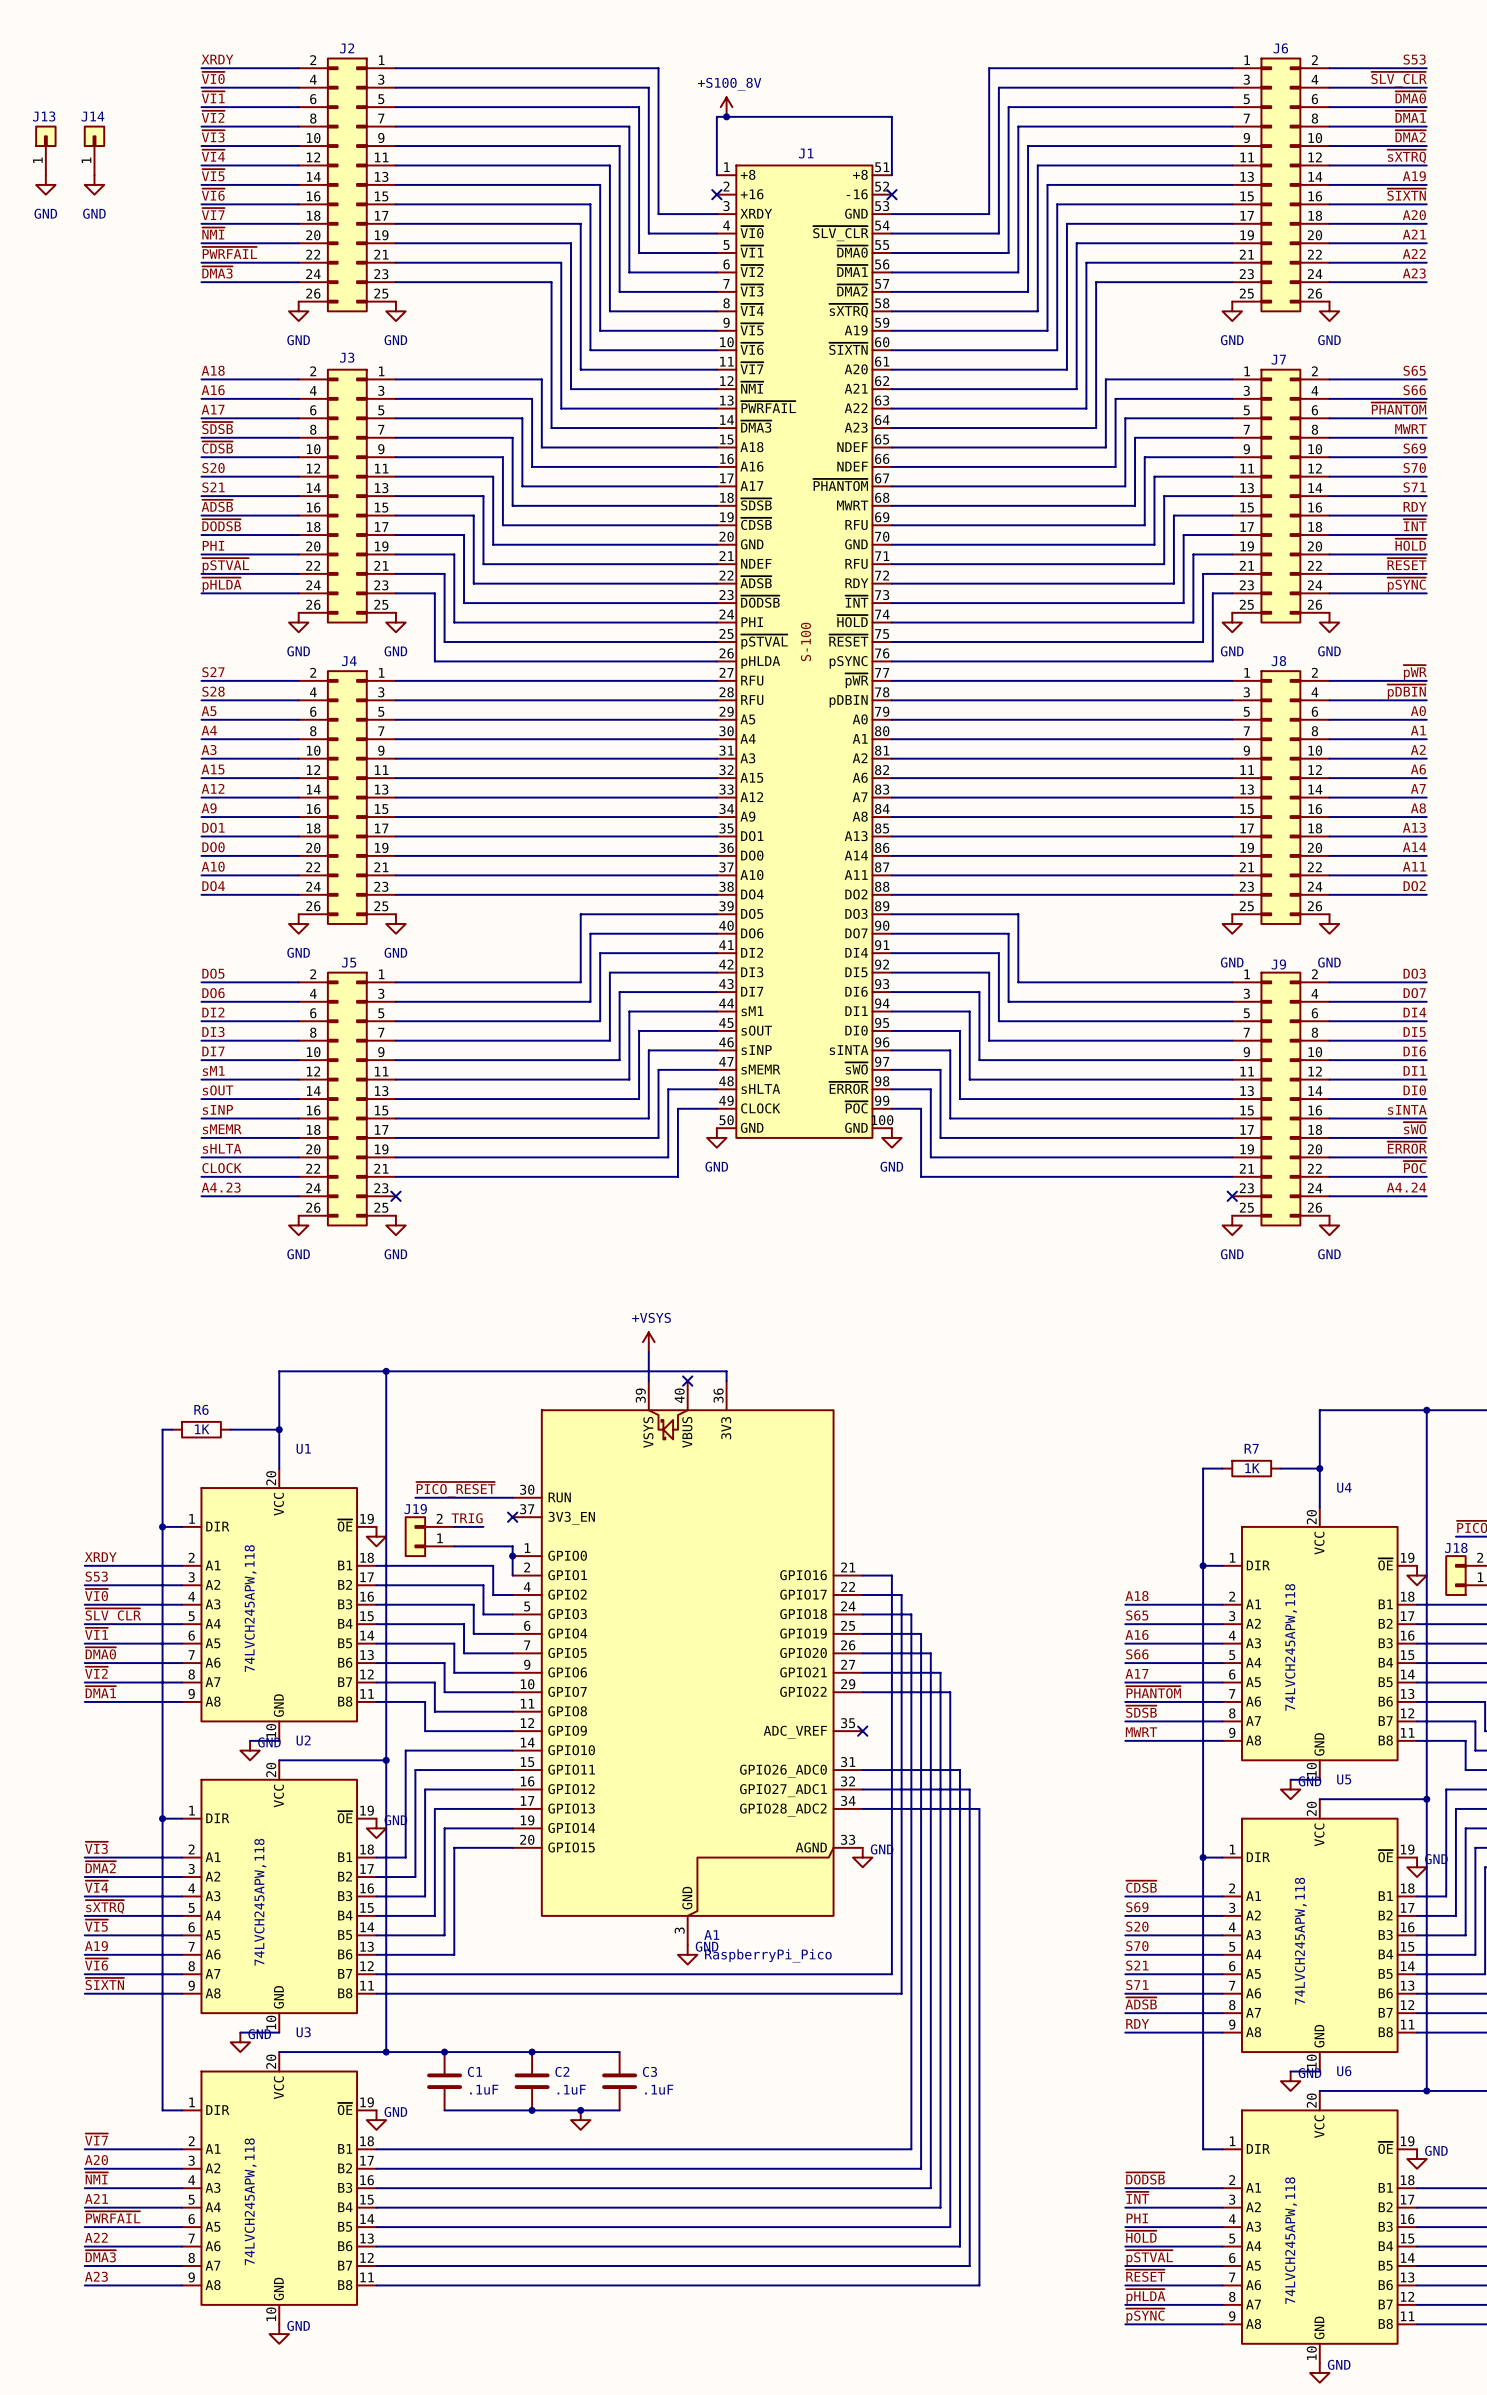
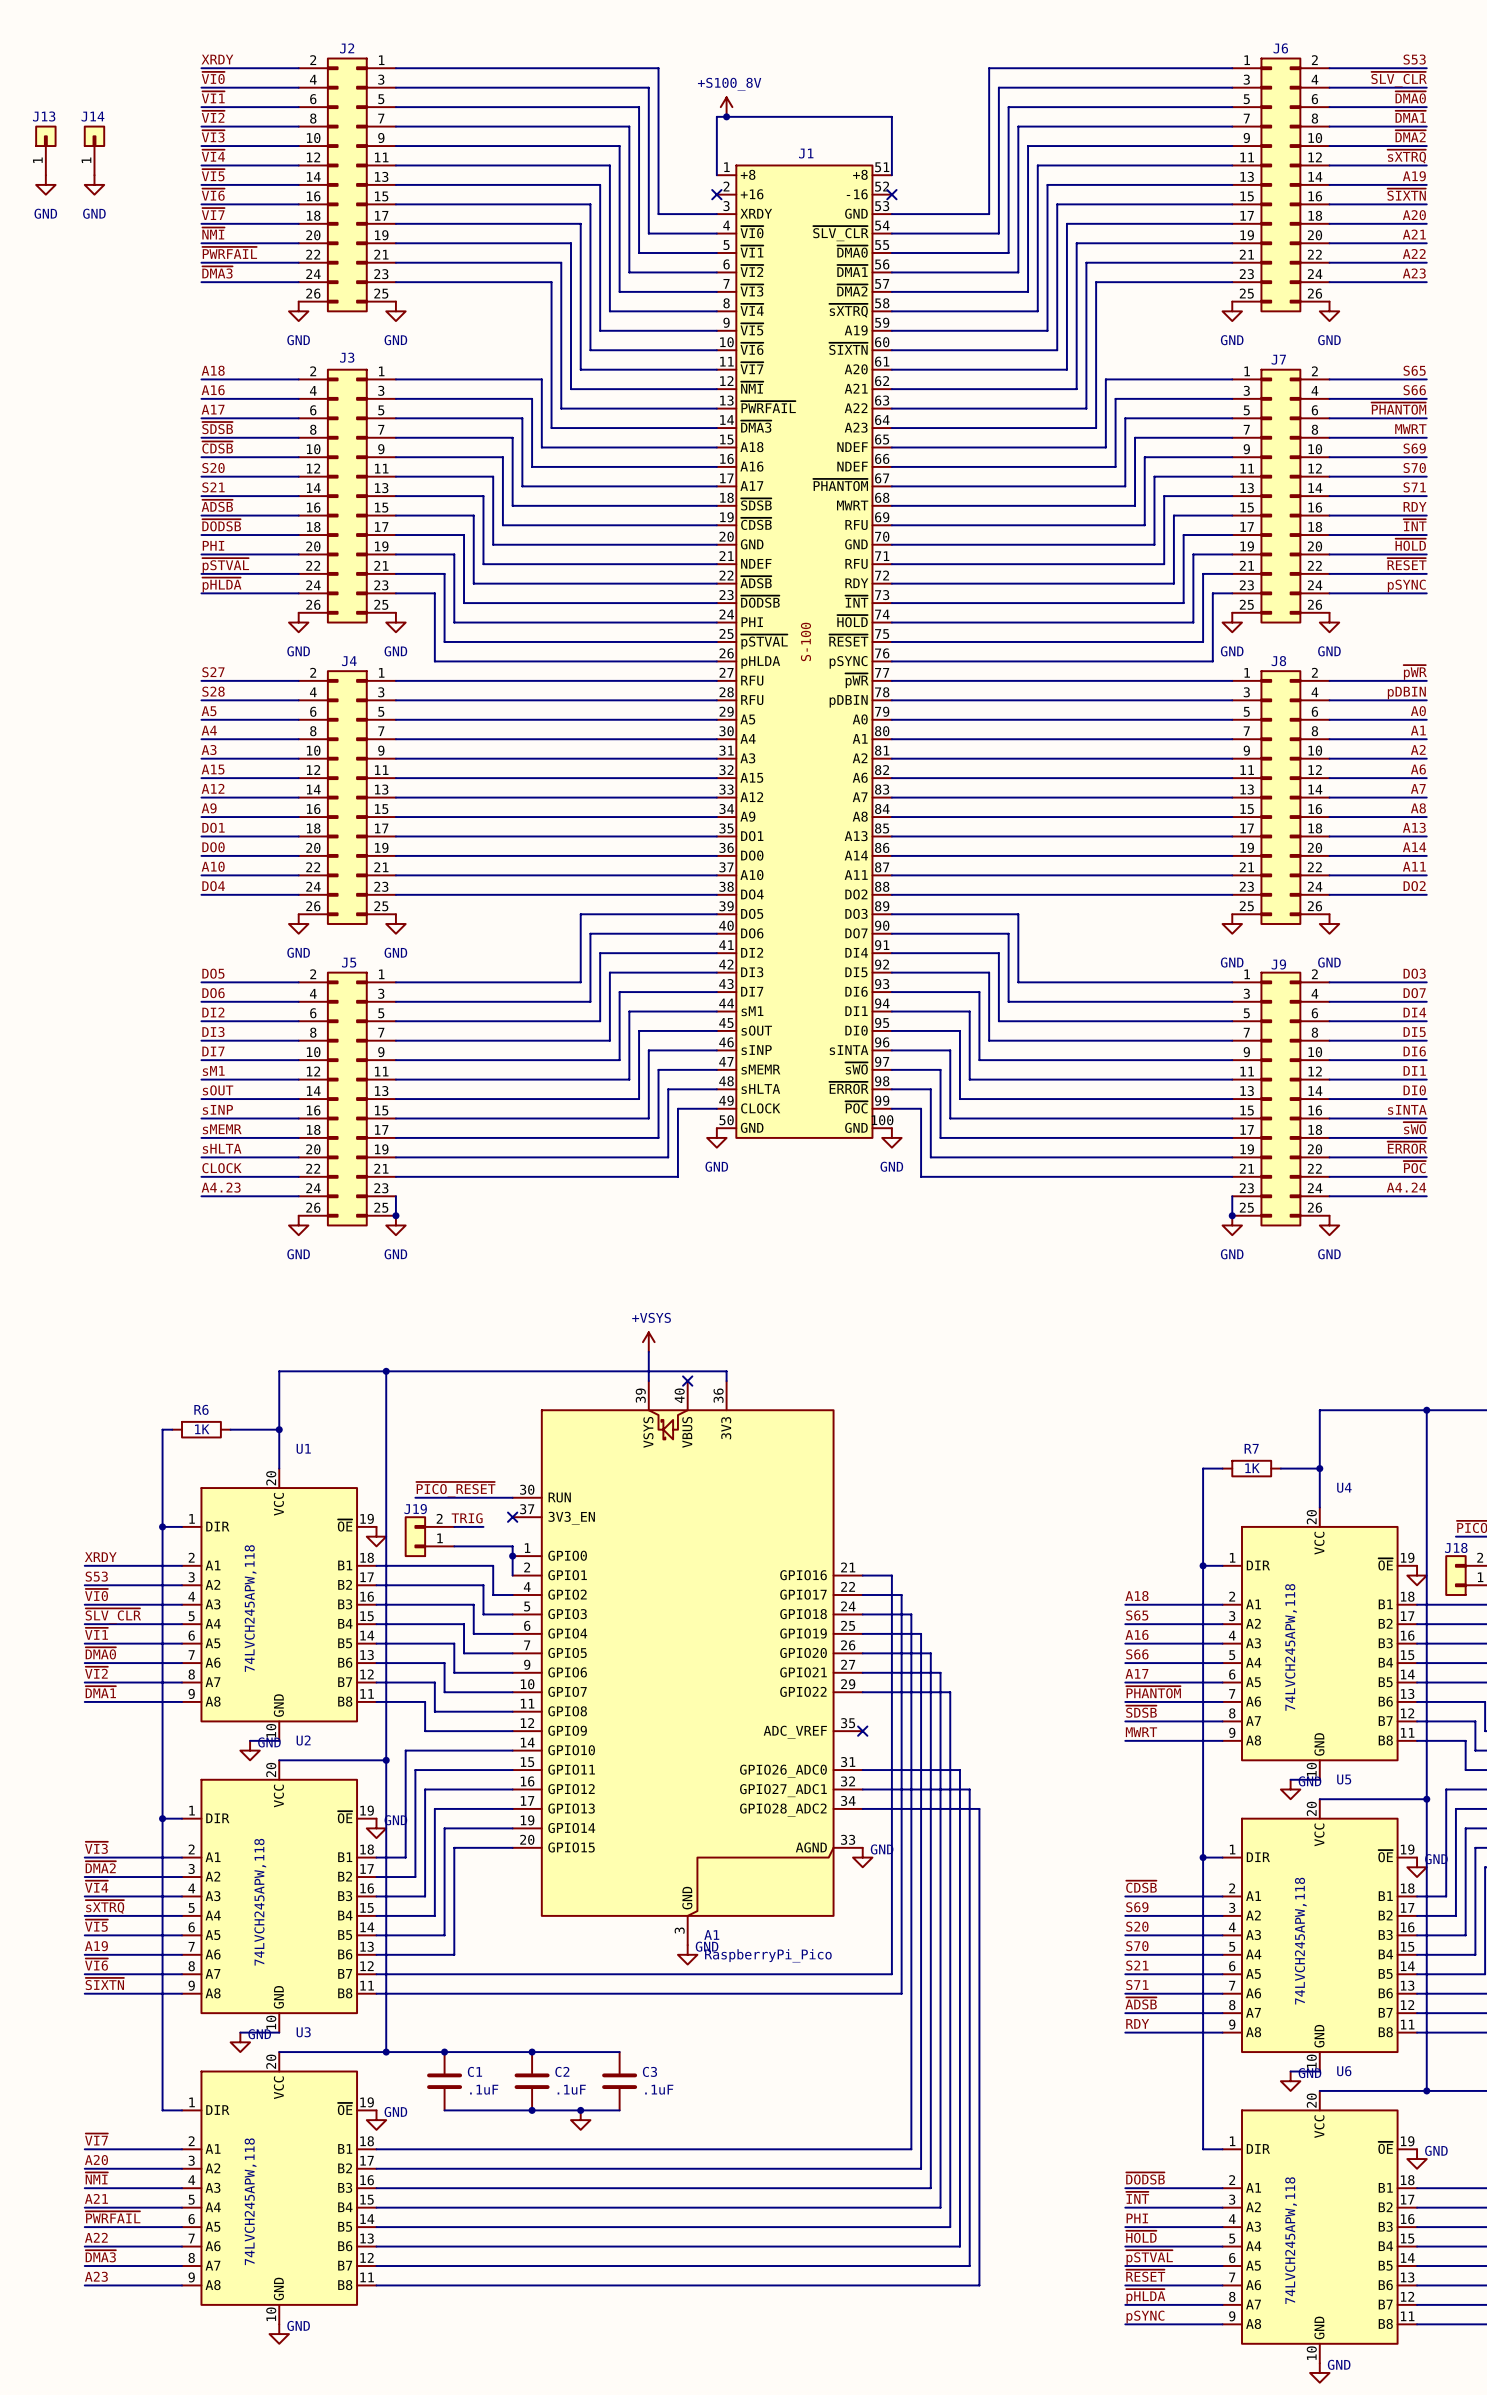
label: ~{pSYNC} (1406, 584) -> pSYNC (1406, 585)
label: ~{pDBIN} (1406, 691) -> pDBIN (1406, 693)
wire: none -> (395, 1196) (395, 1215)
no-connect mark: (395, 1196) -> none
wire: none -> (1232, 1196) (1232, 1215)
no-connect mark: (1232, 1196) -> none
junction: none -> (395, 1215)
junction: none -> (1232, 1215)
label: ~{pSYNC} (1145, 2315) -> pSYNC (1145, 2316)

